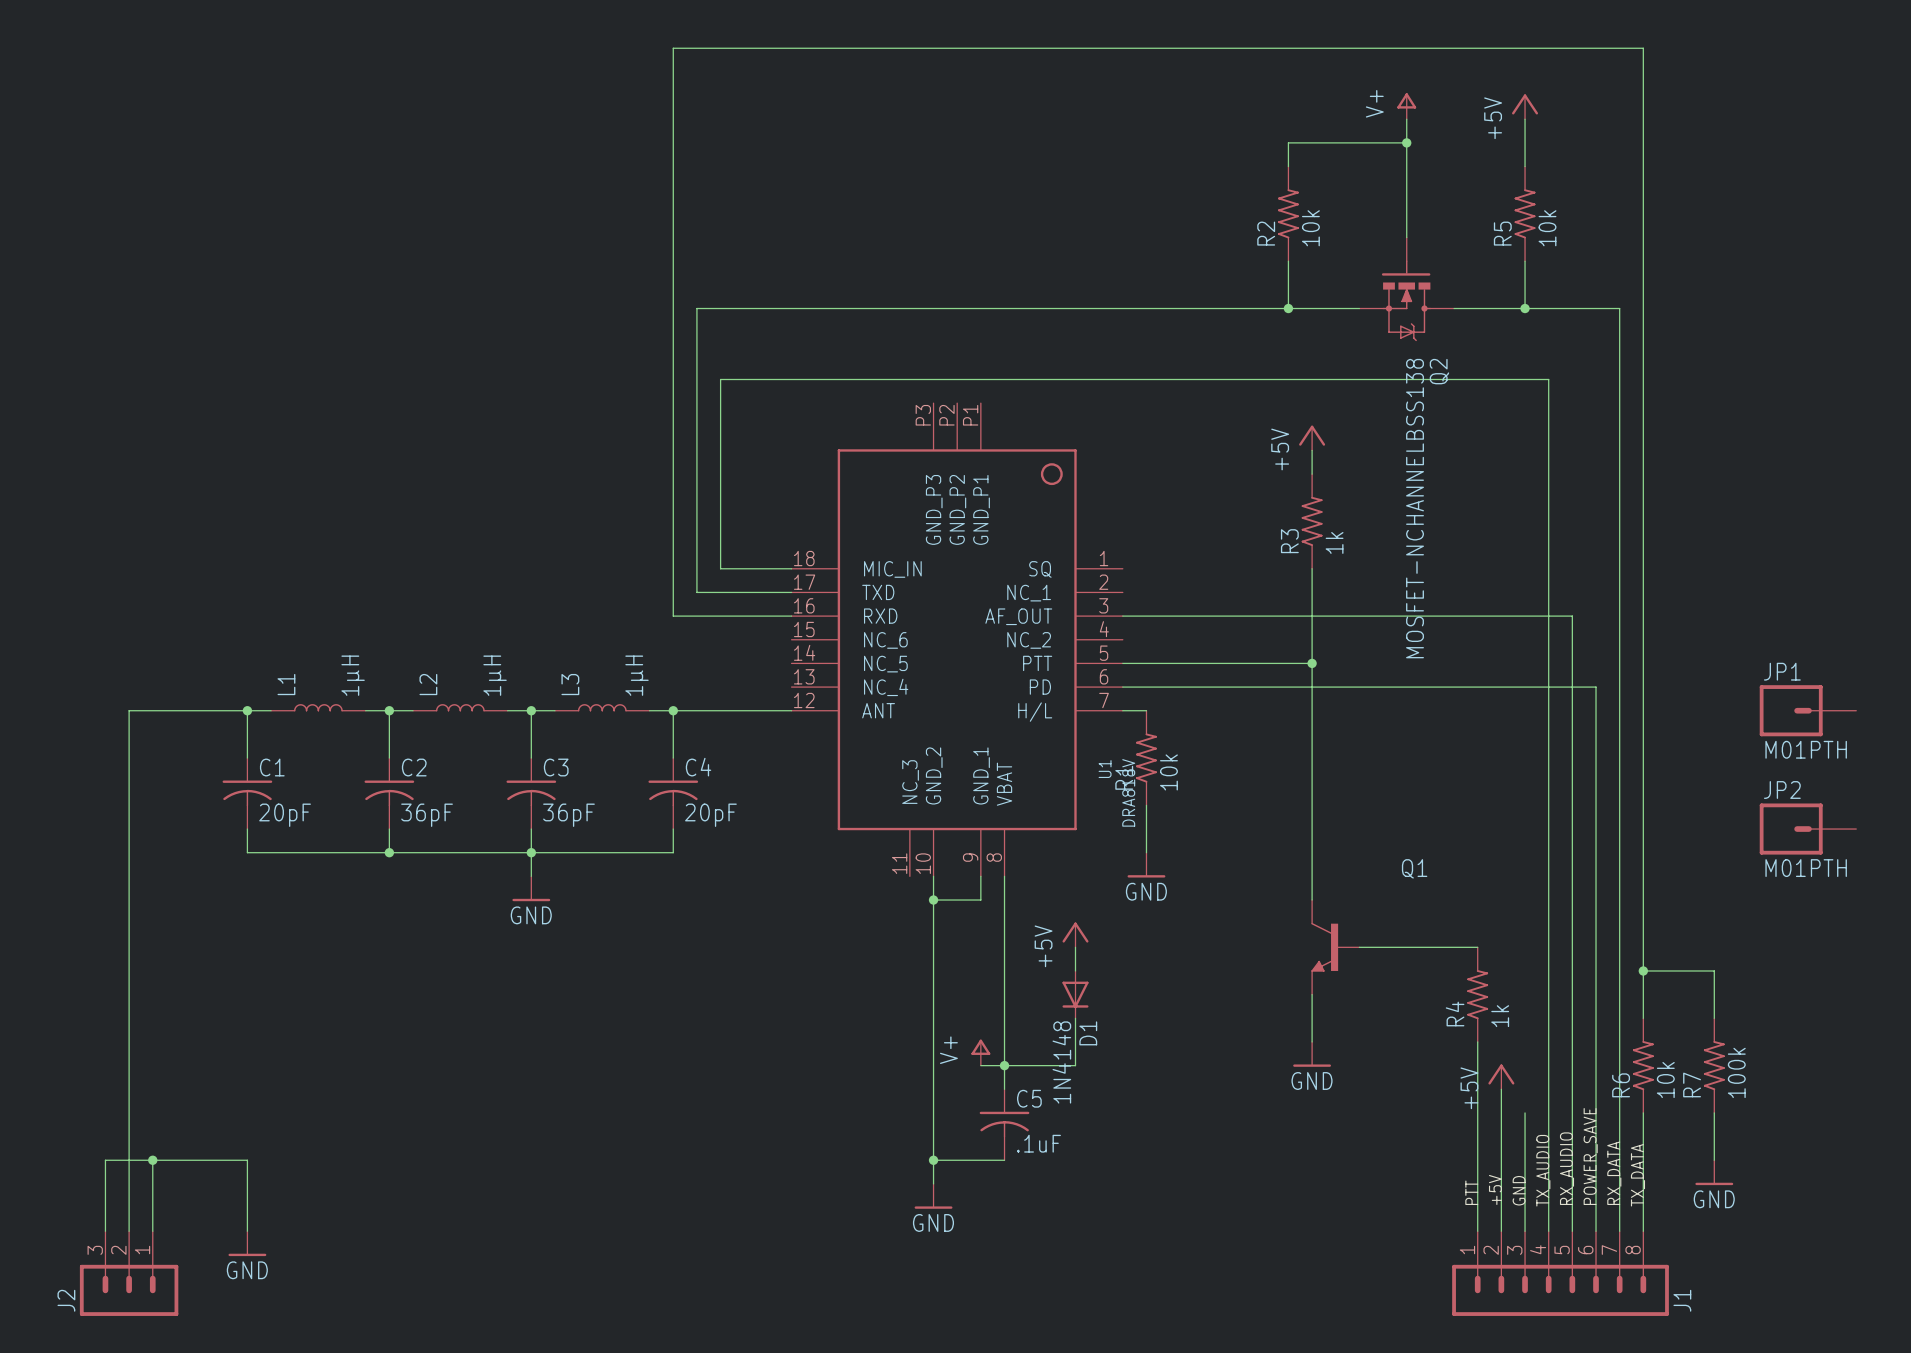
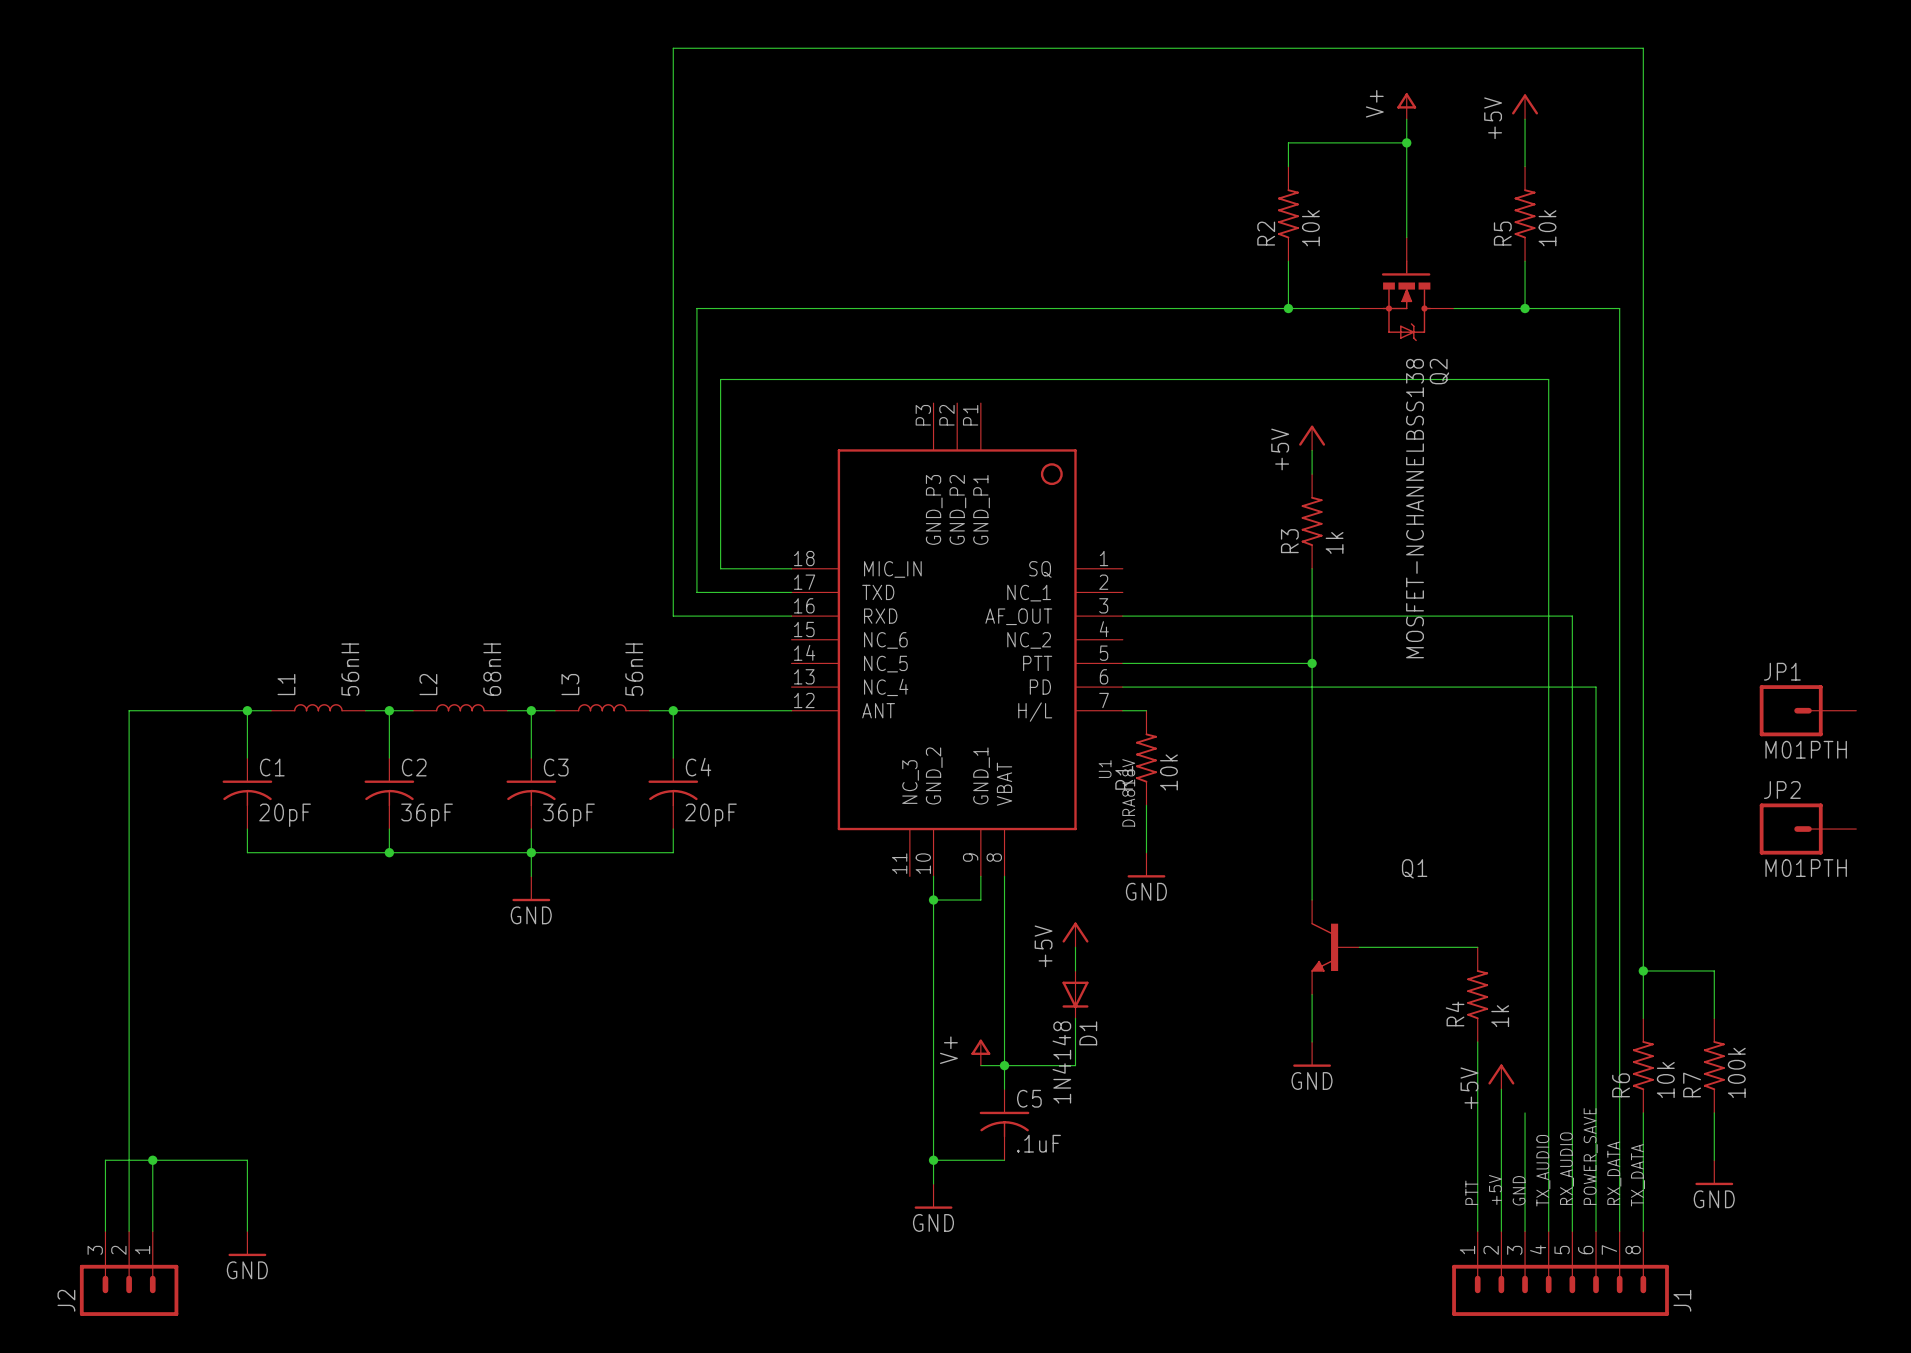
L1 value: 1µH (353, 675) -> 56nH (350, 669)
L2 value: 1µH (495, 675) -> 68nH (492, 669)
L3 value: 1µH (637, 675) -> 56nH (634, 669)

